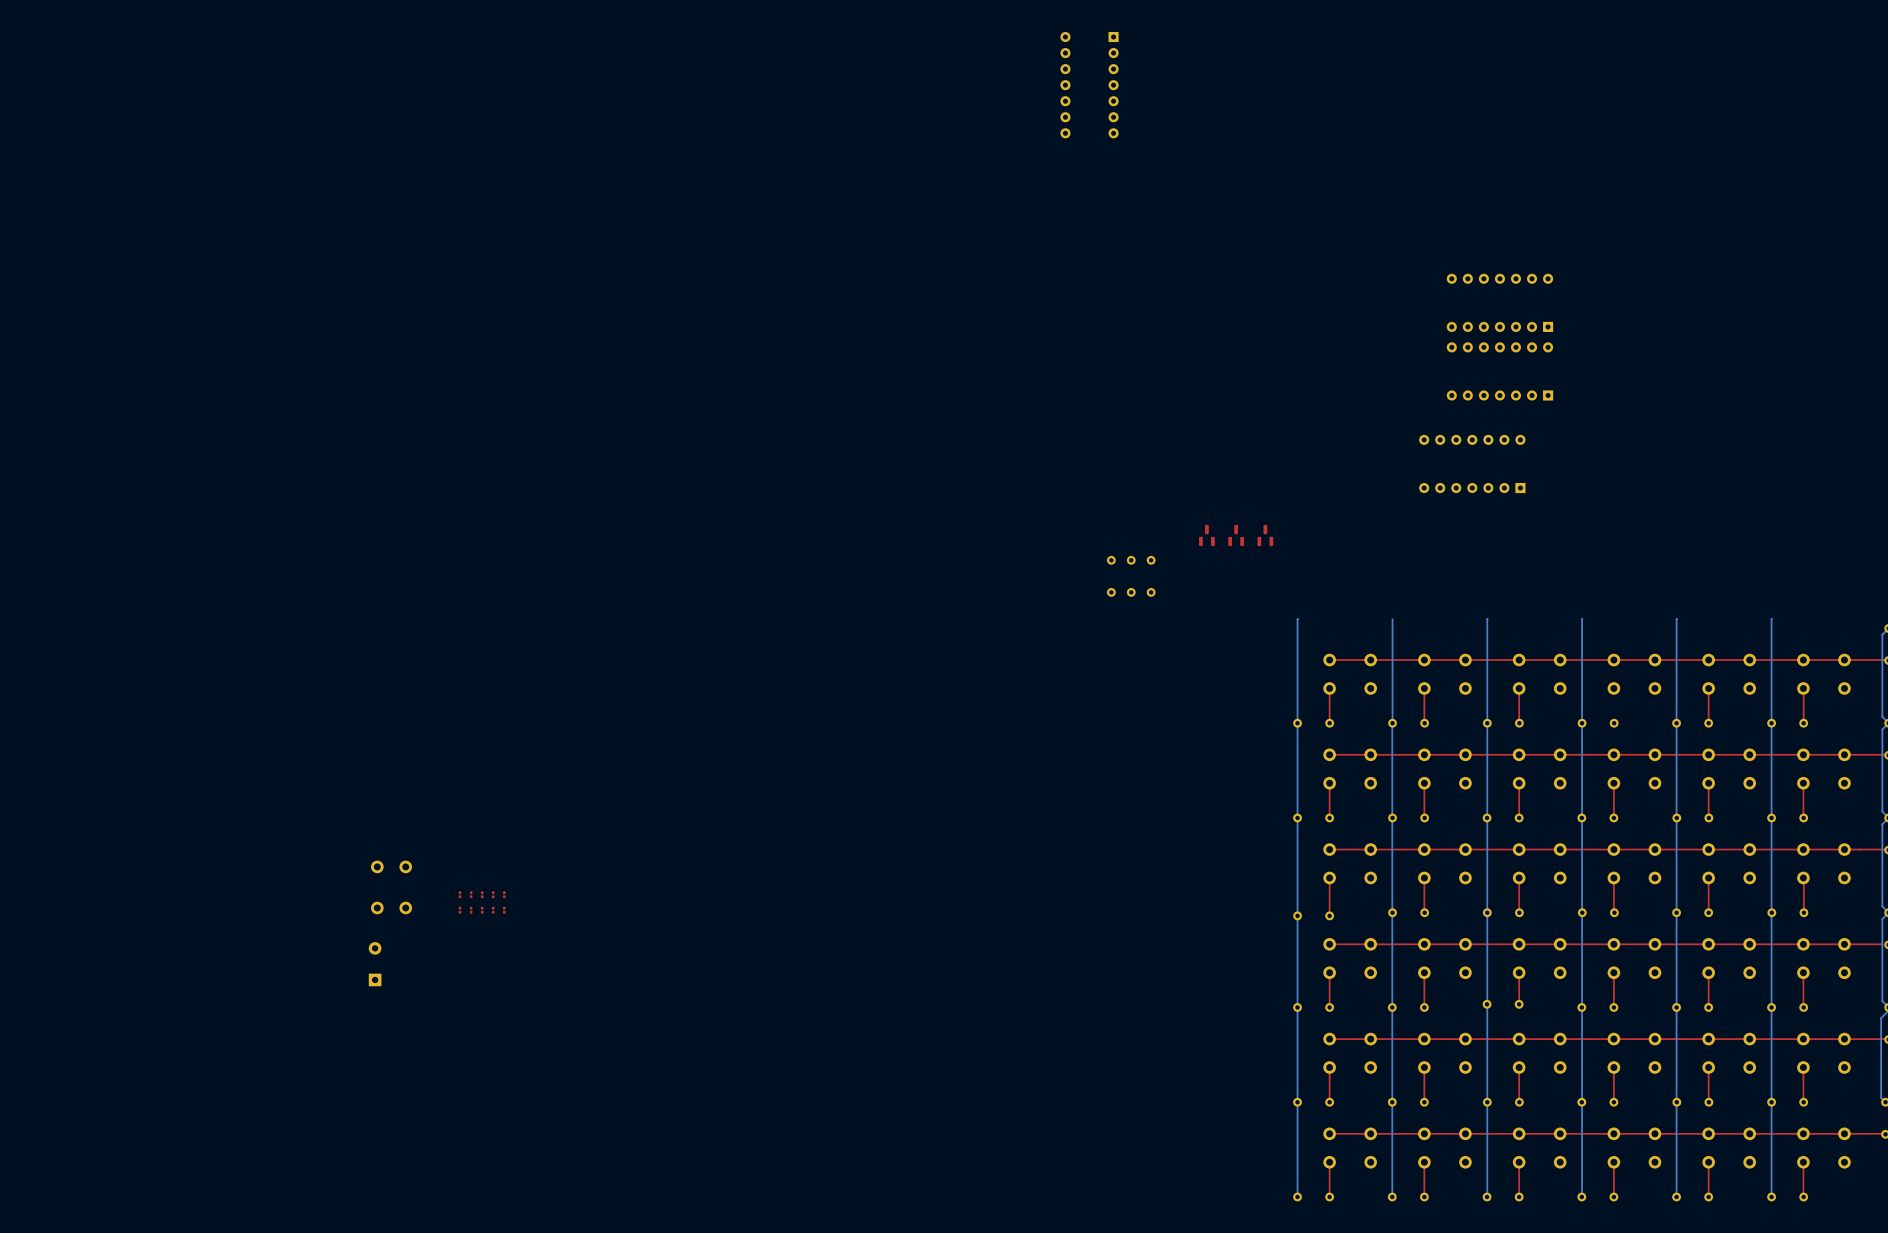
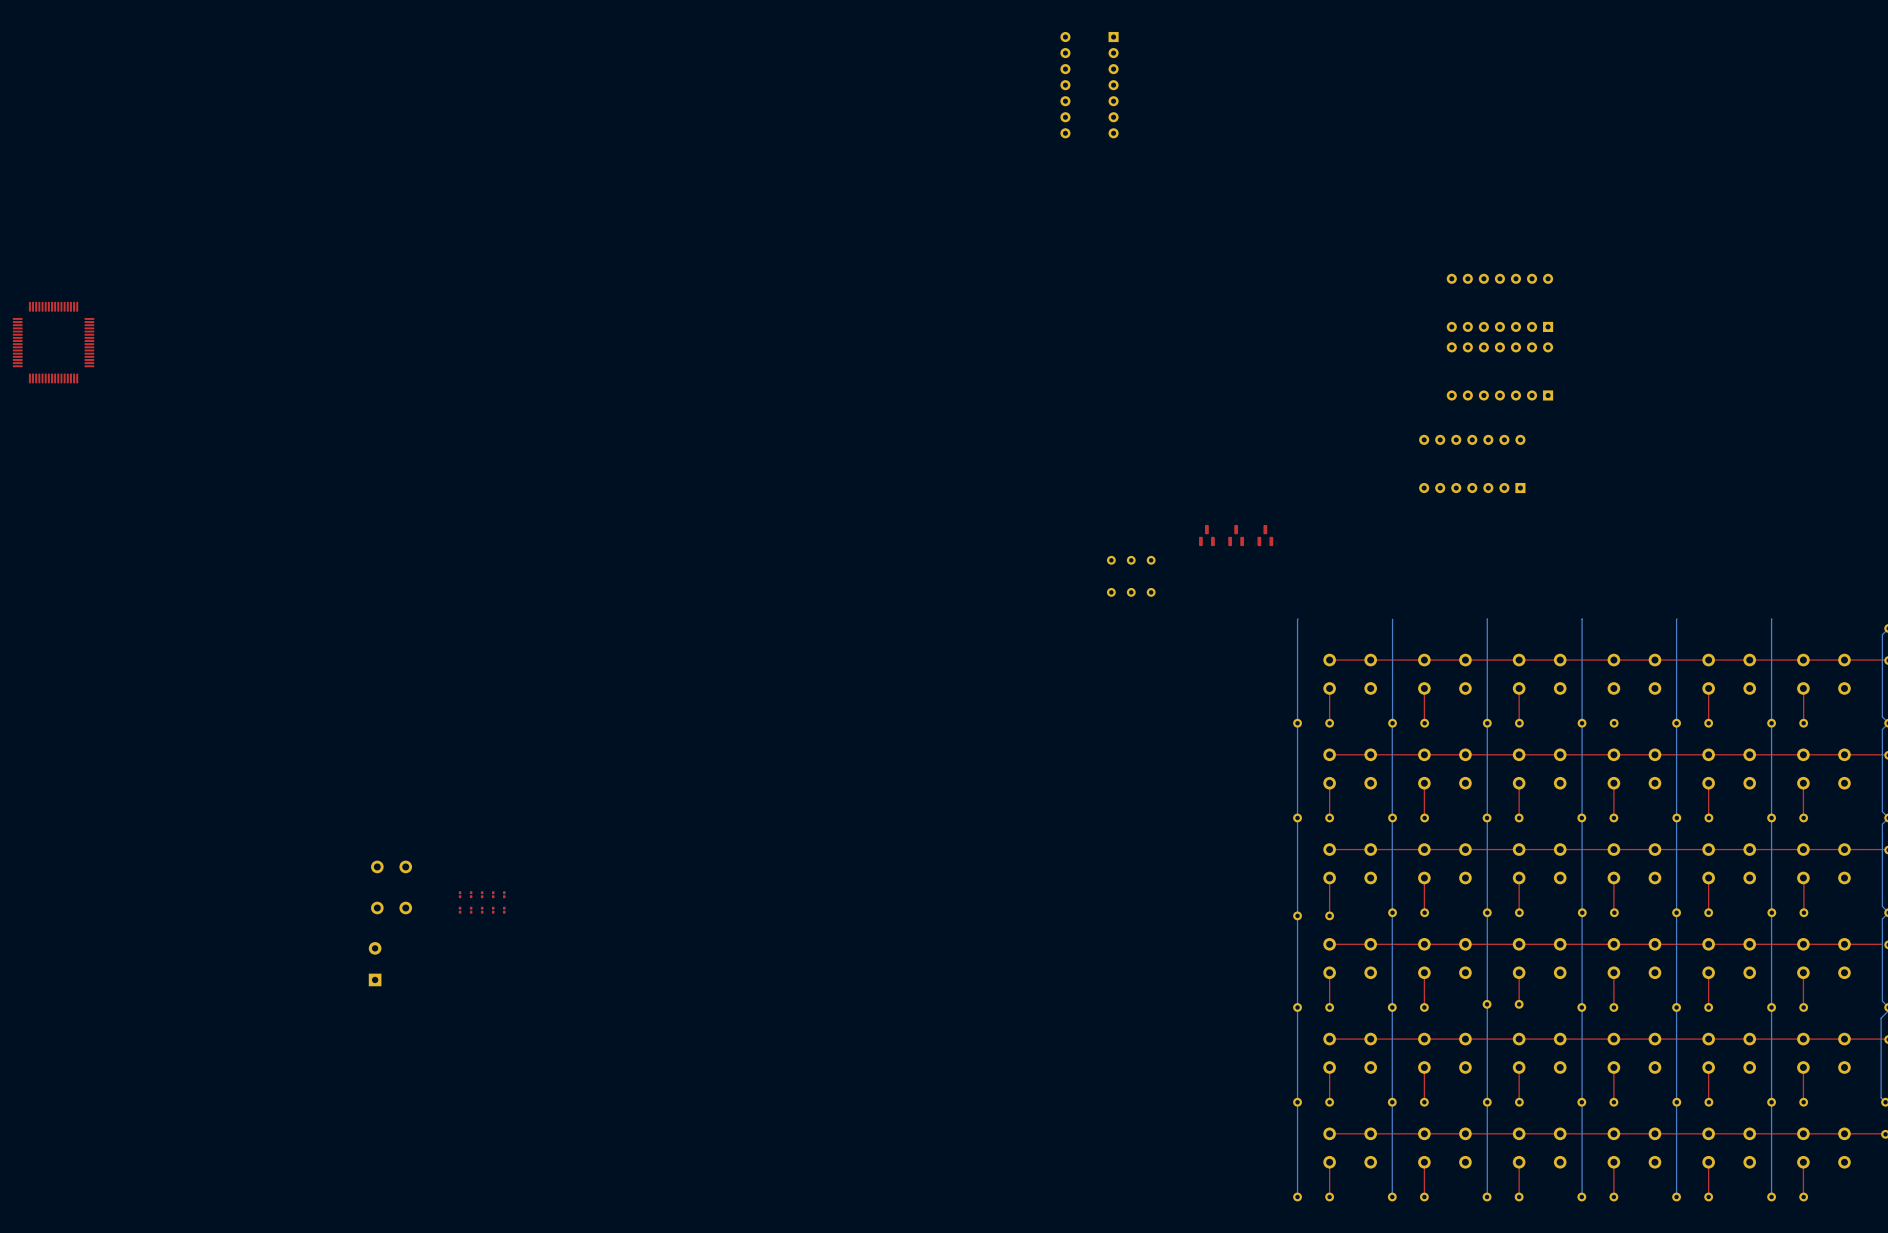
part: none -> (53, 342)

